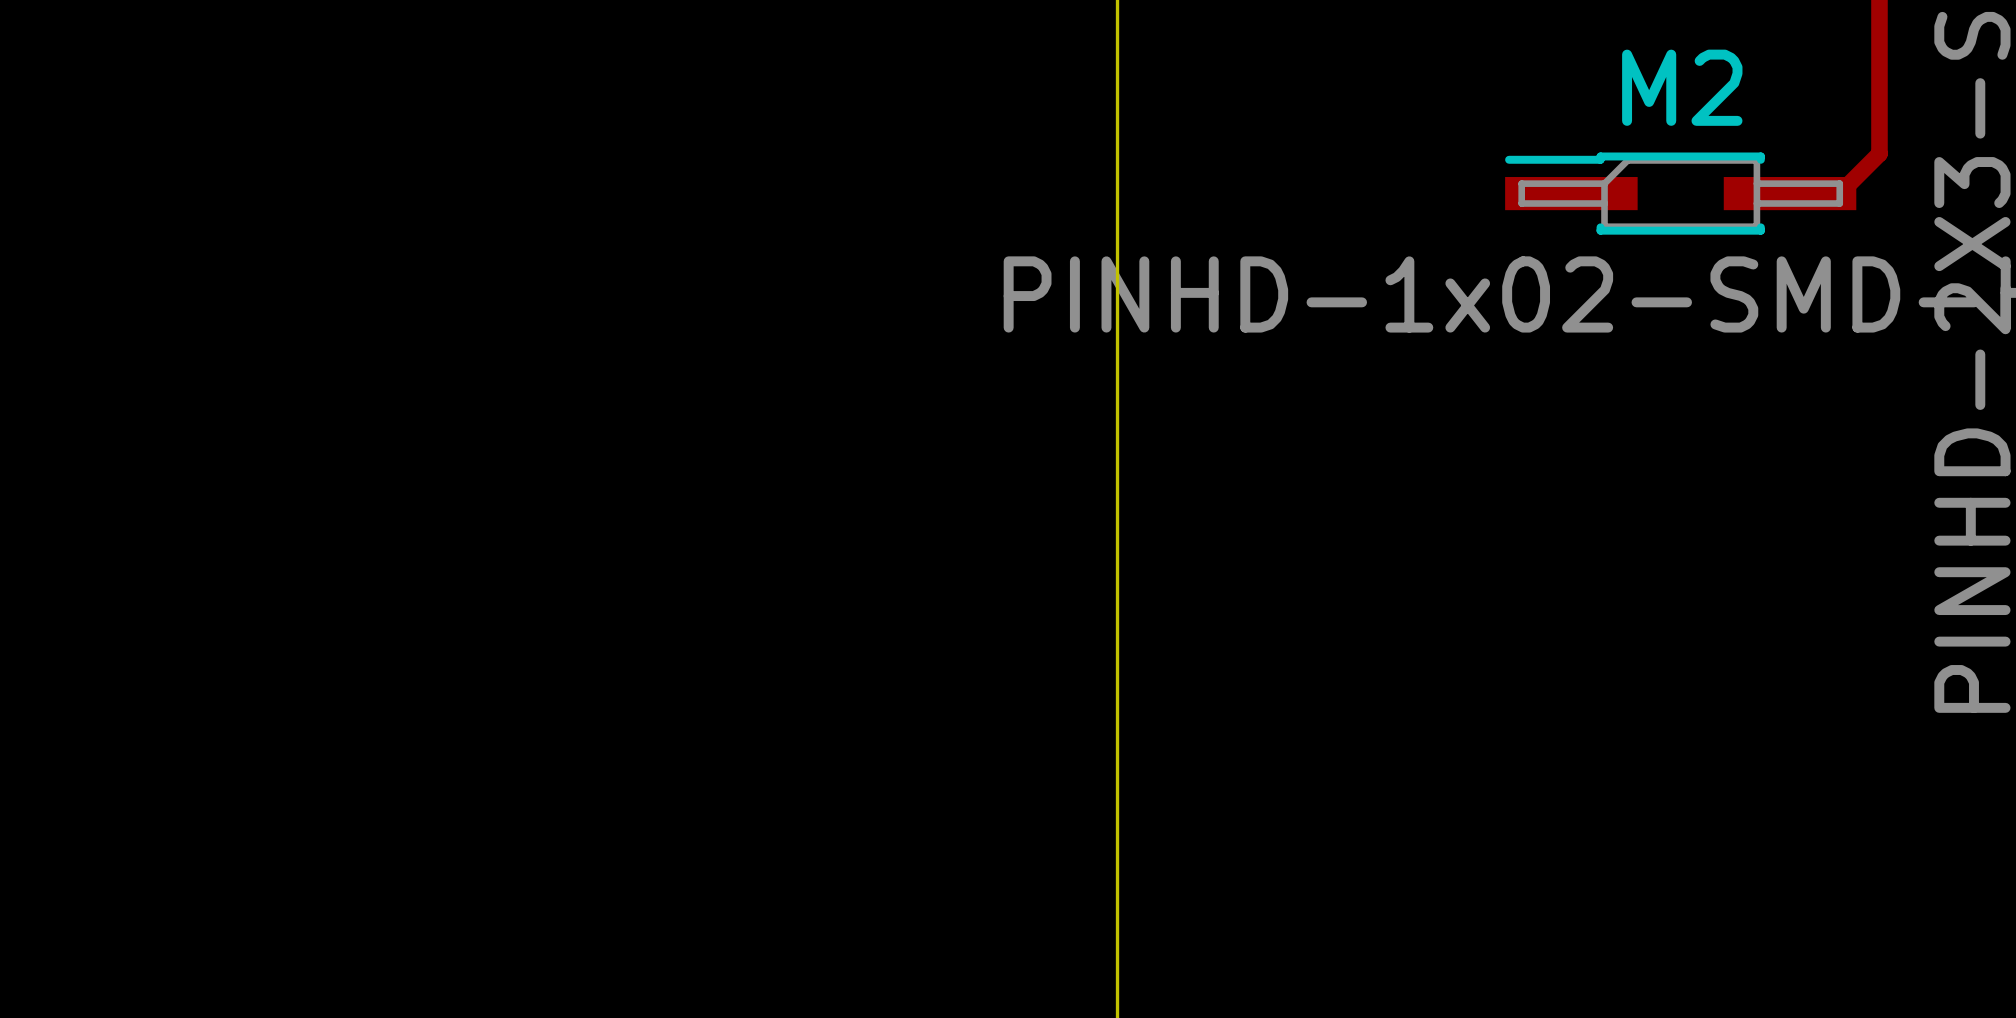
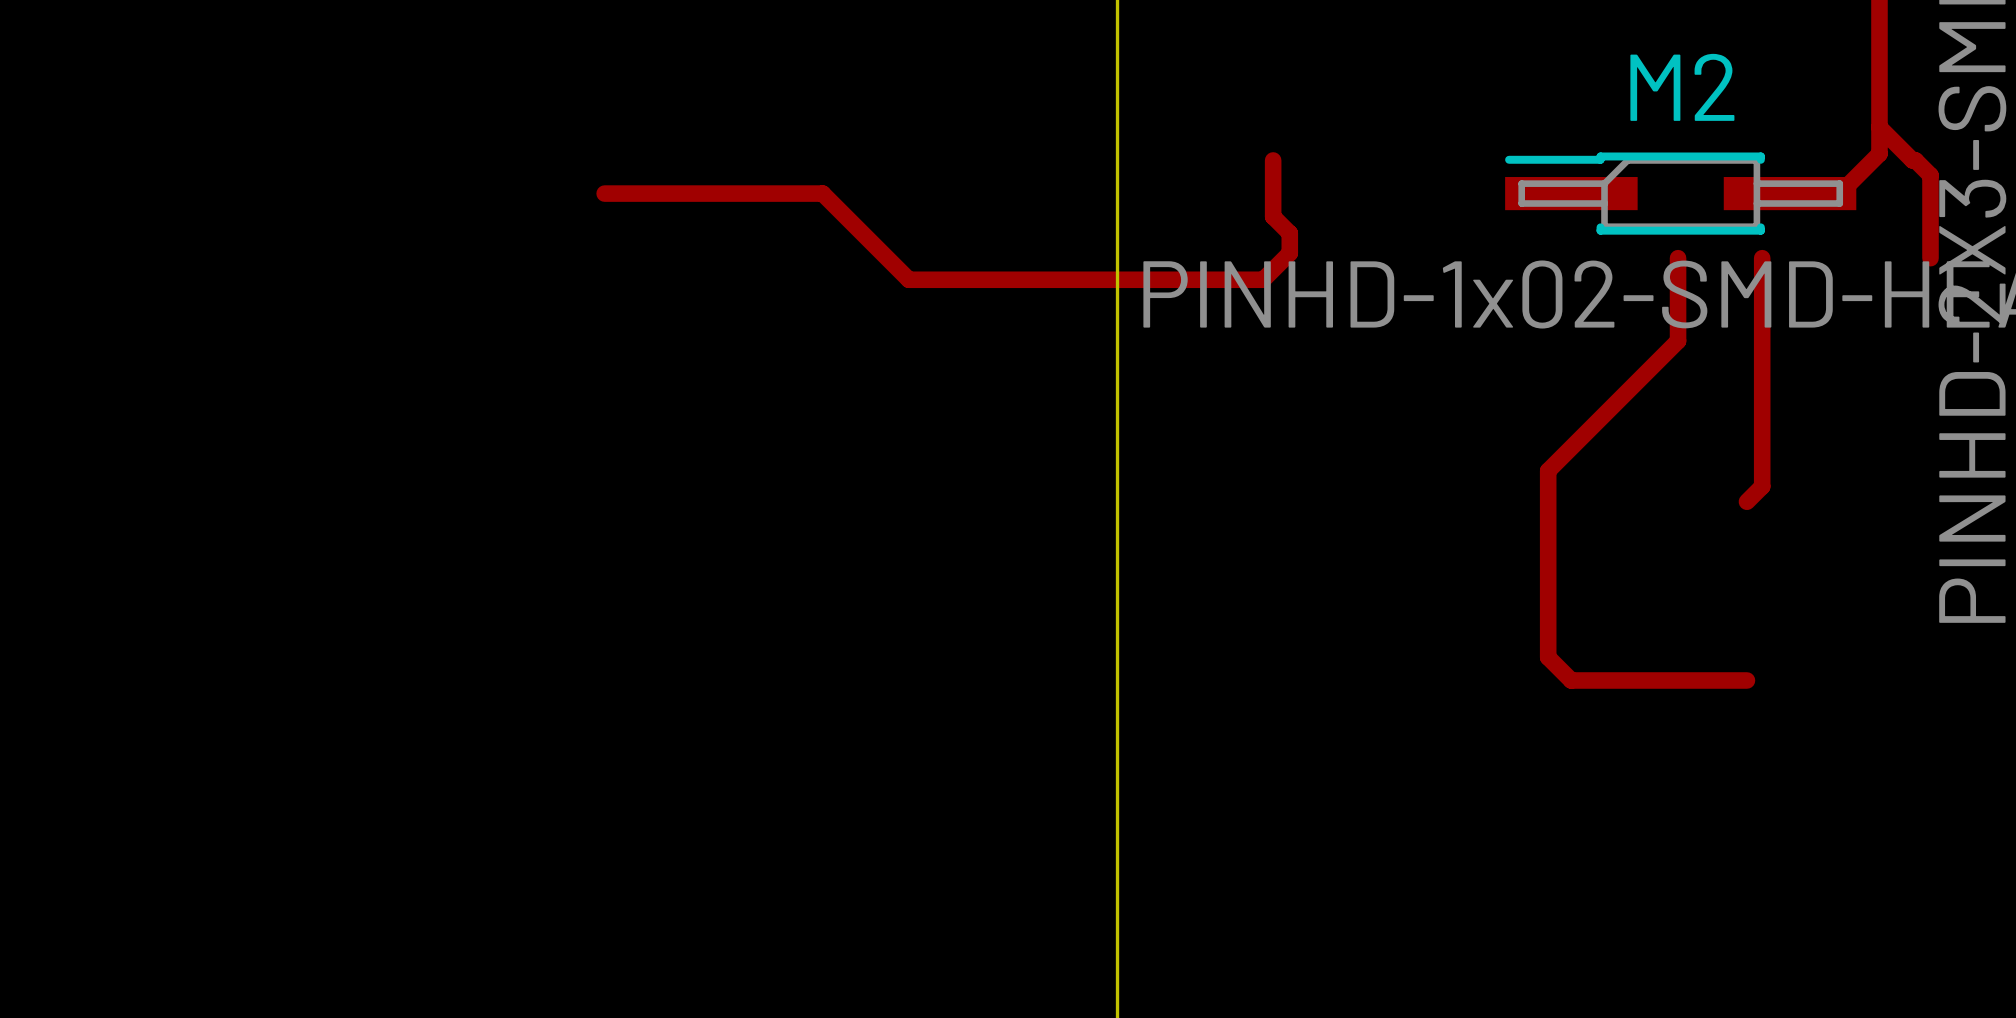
top track: none -> (1879, 127) (1930, 175) (1930, 258)
top track: none -> (1273, 160) (1273, 216) (1289, 233) (1289, 253) (1263, 279) (908, 279) (822, 193) (604, 193)
top track: none -> (1678, 258) (1678, 341) (1548, 470) (1548, 657) (1571, 680) (1746, 680)
top track: none -> (1762, 258) (1762, 486) (1746, 501)

